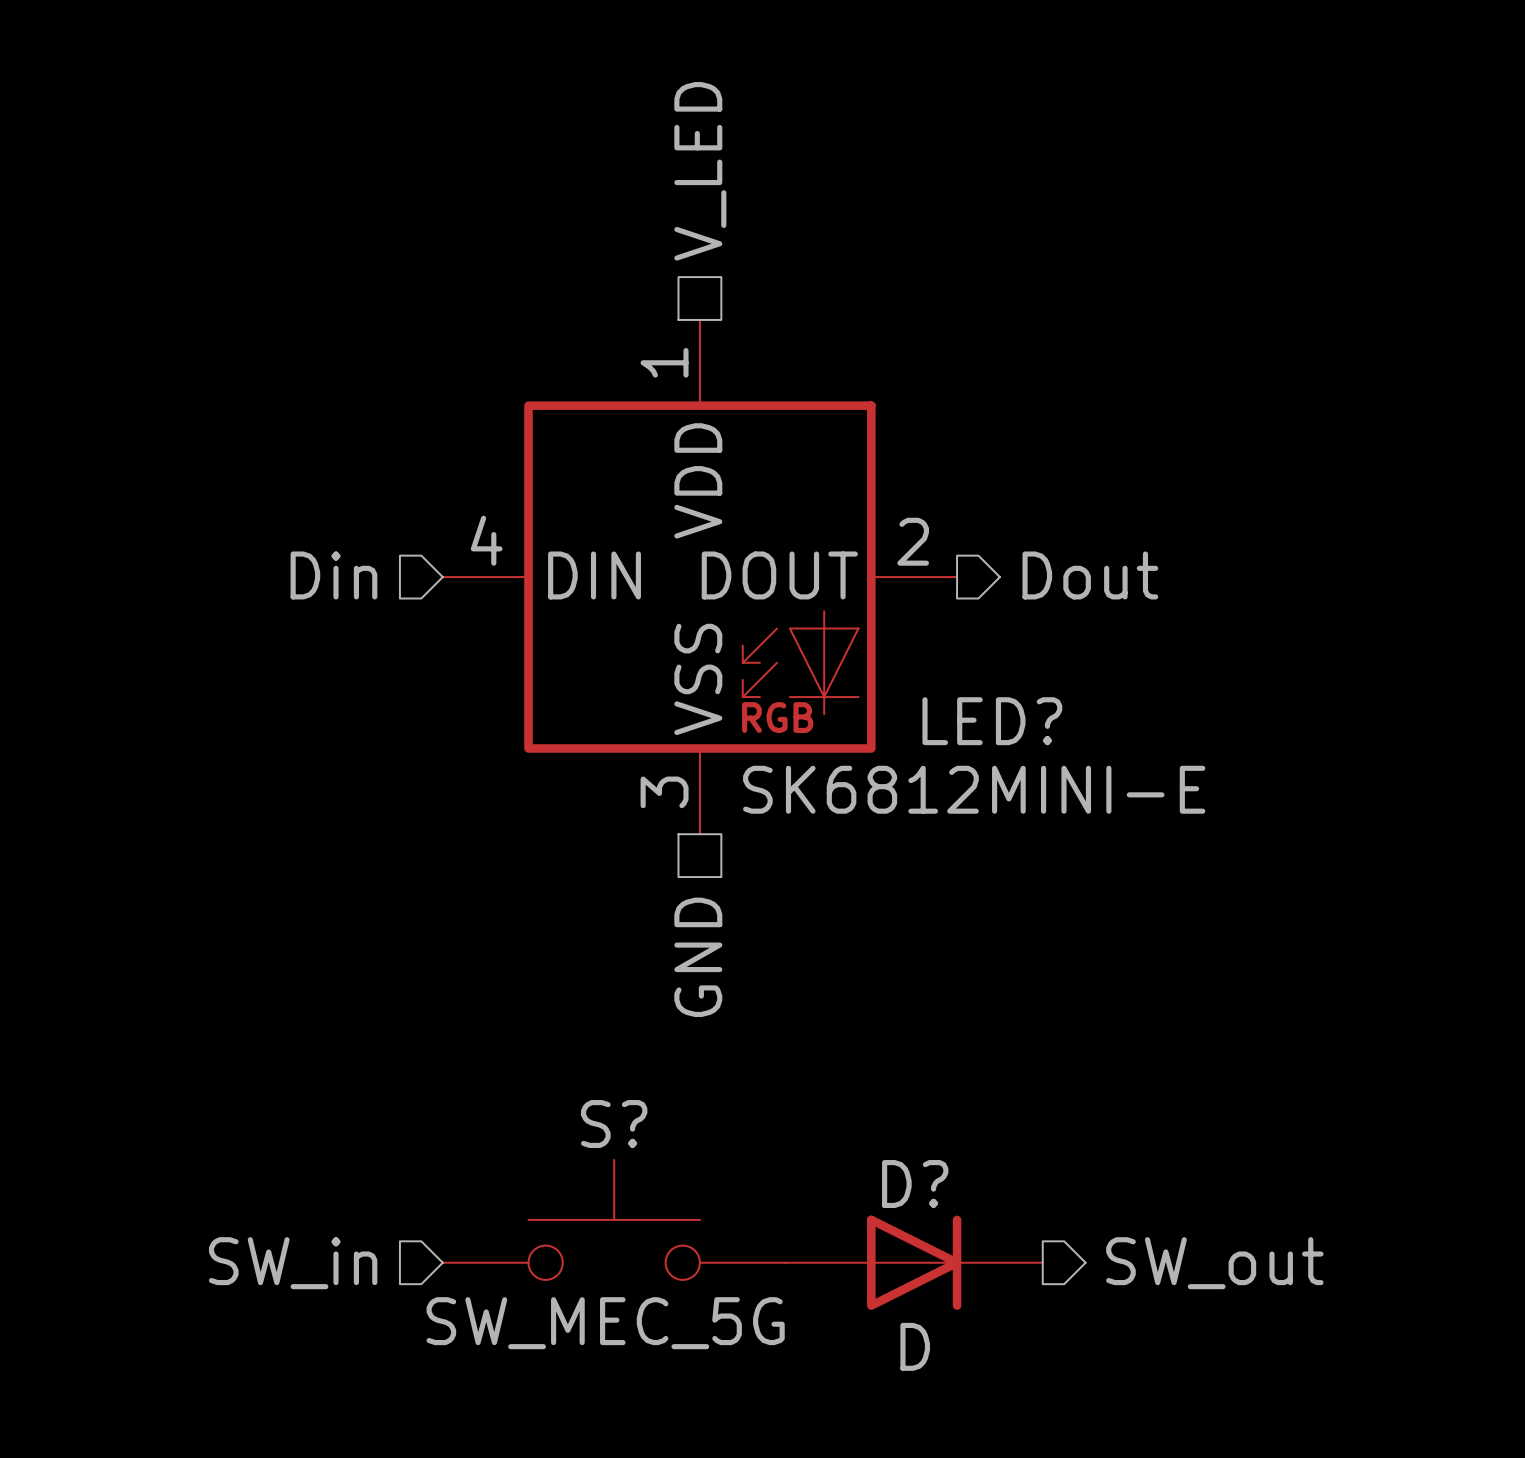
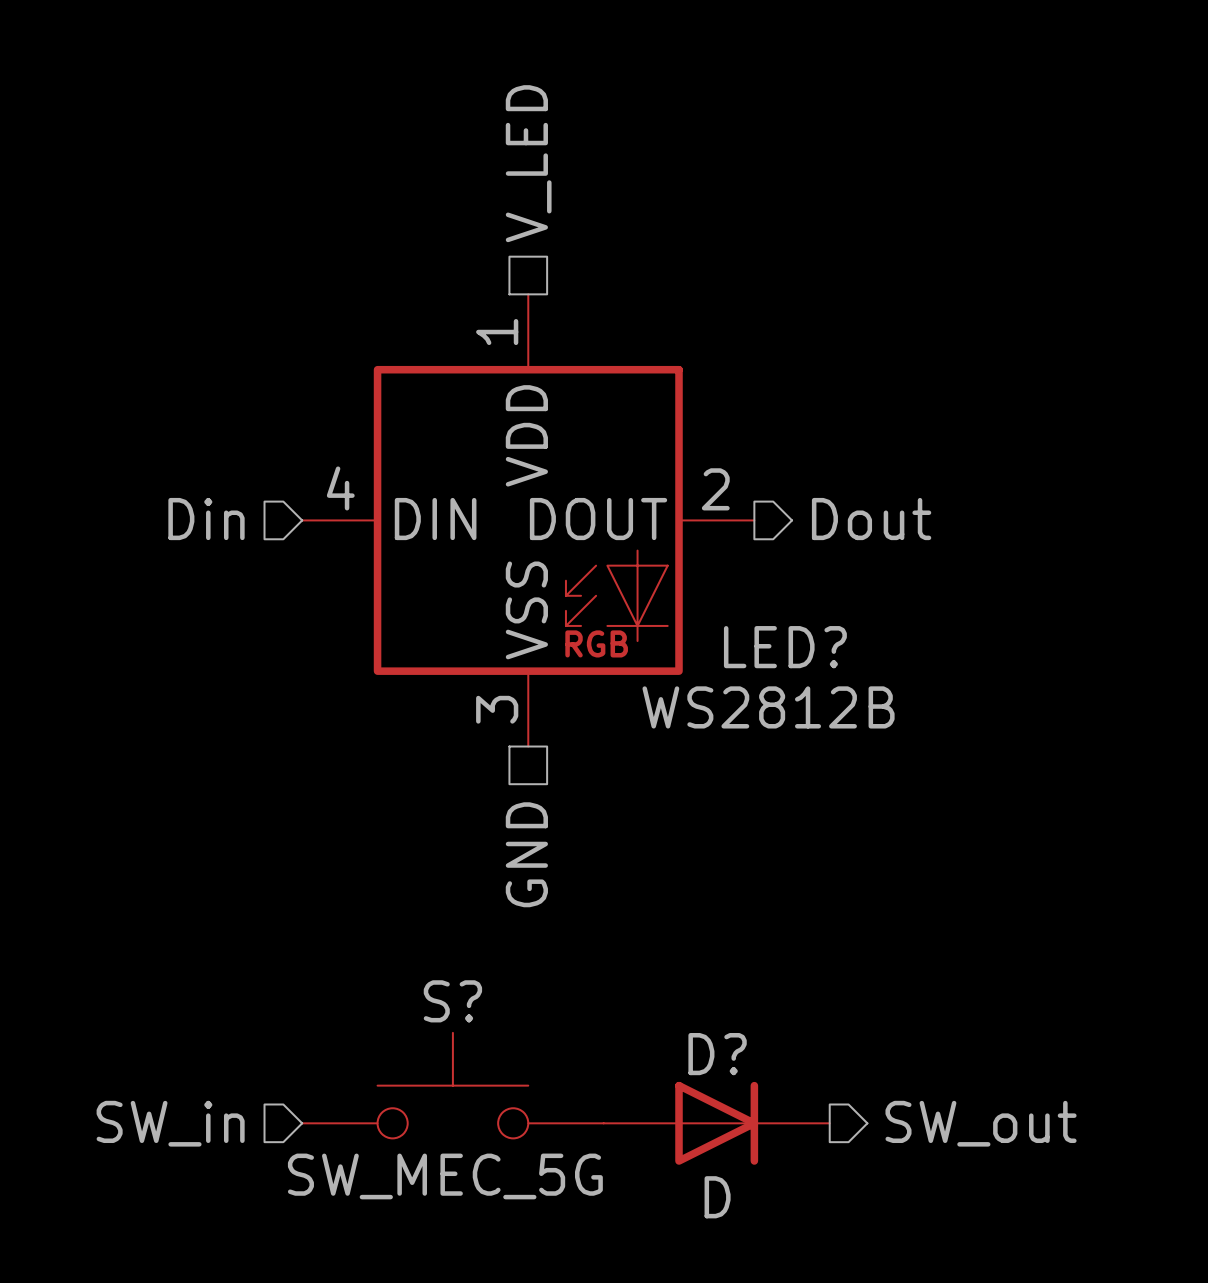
LED? value: SK6812MINI-E (974, 789) -> WS2812B (768, 707)

